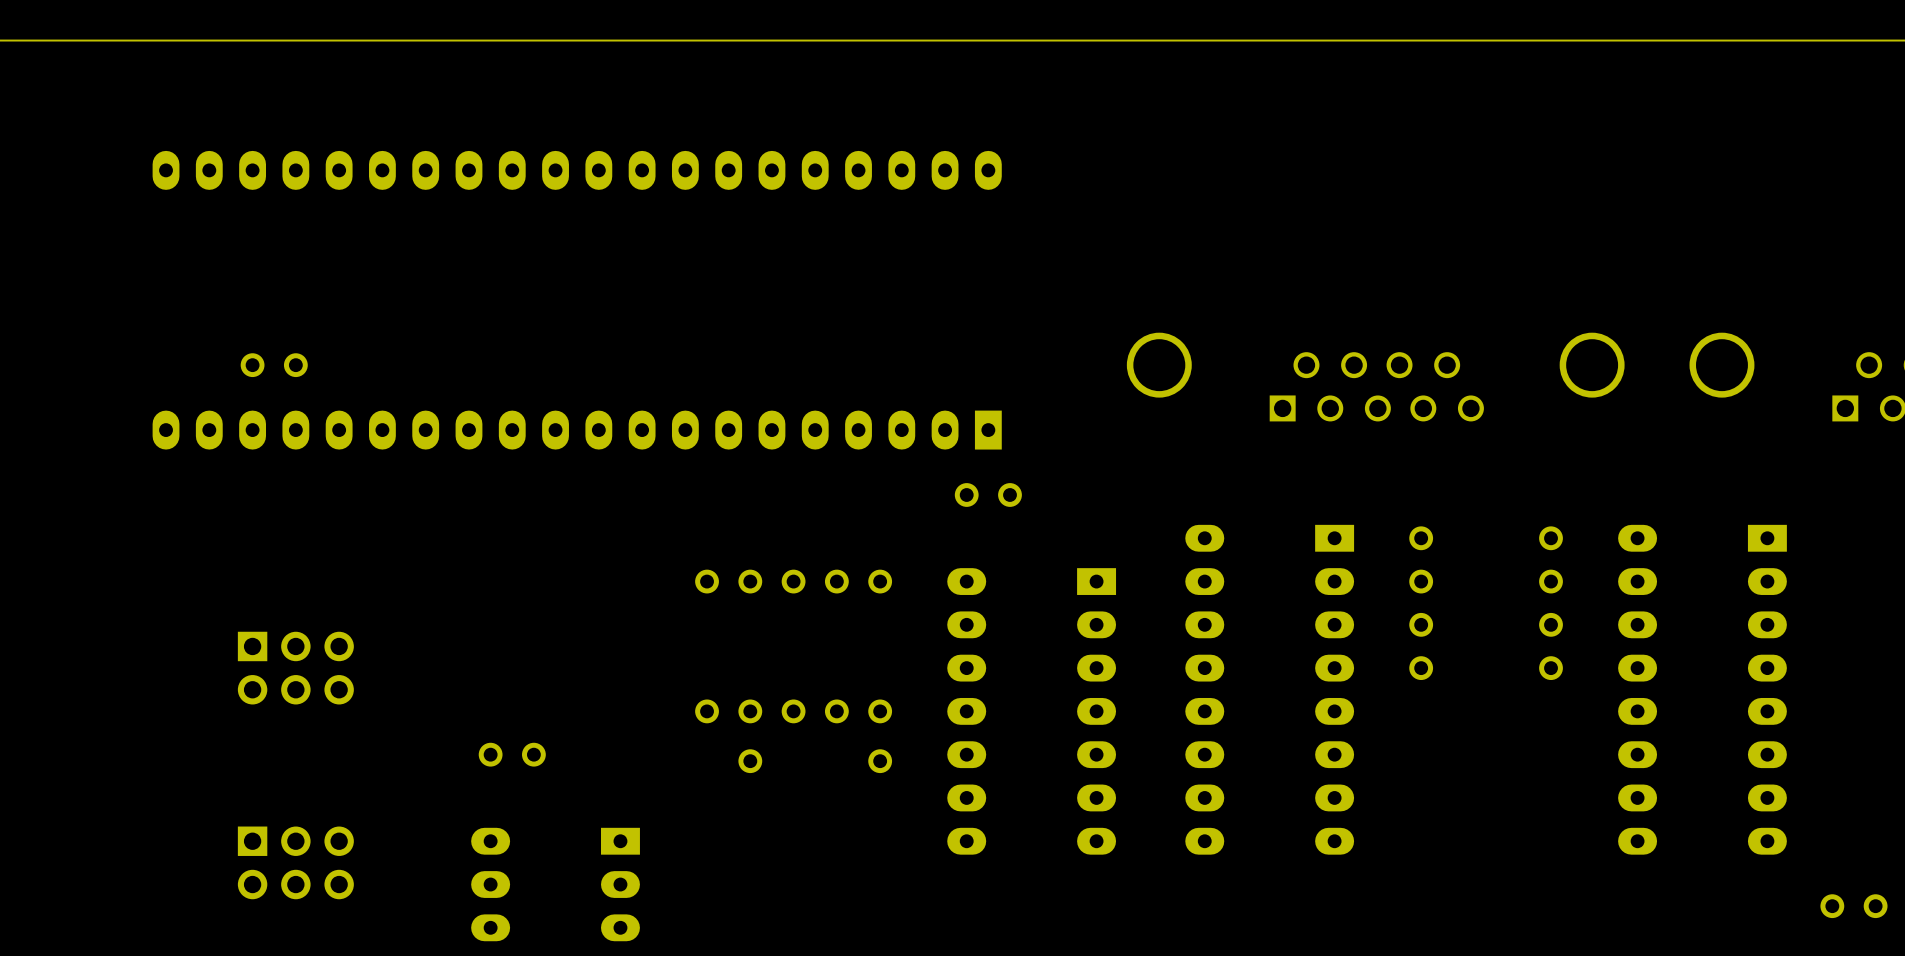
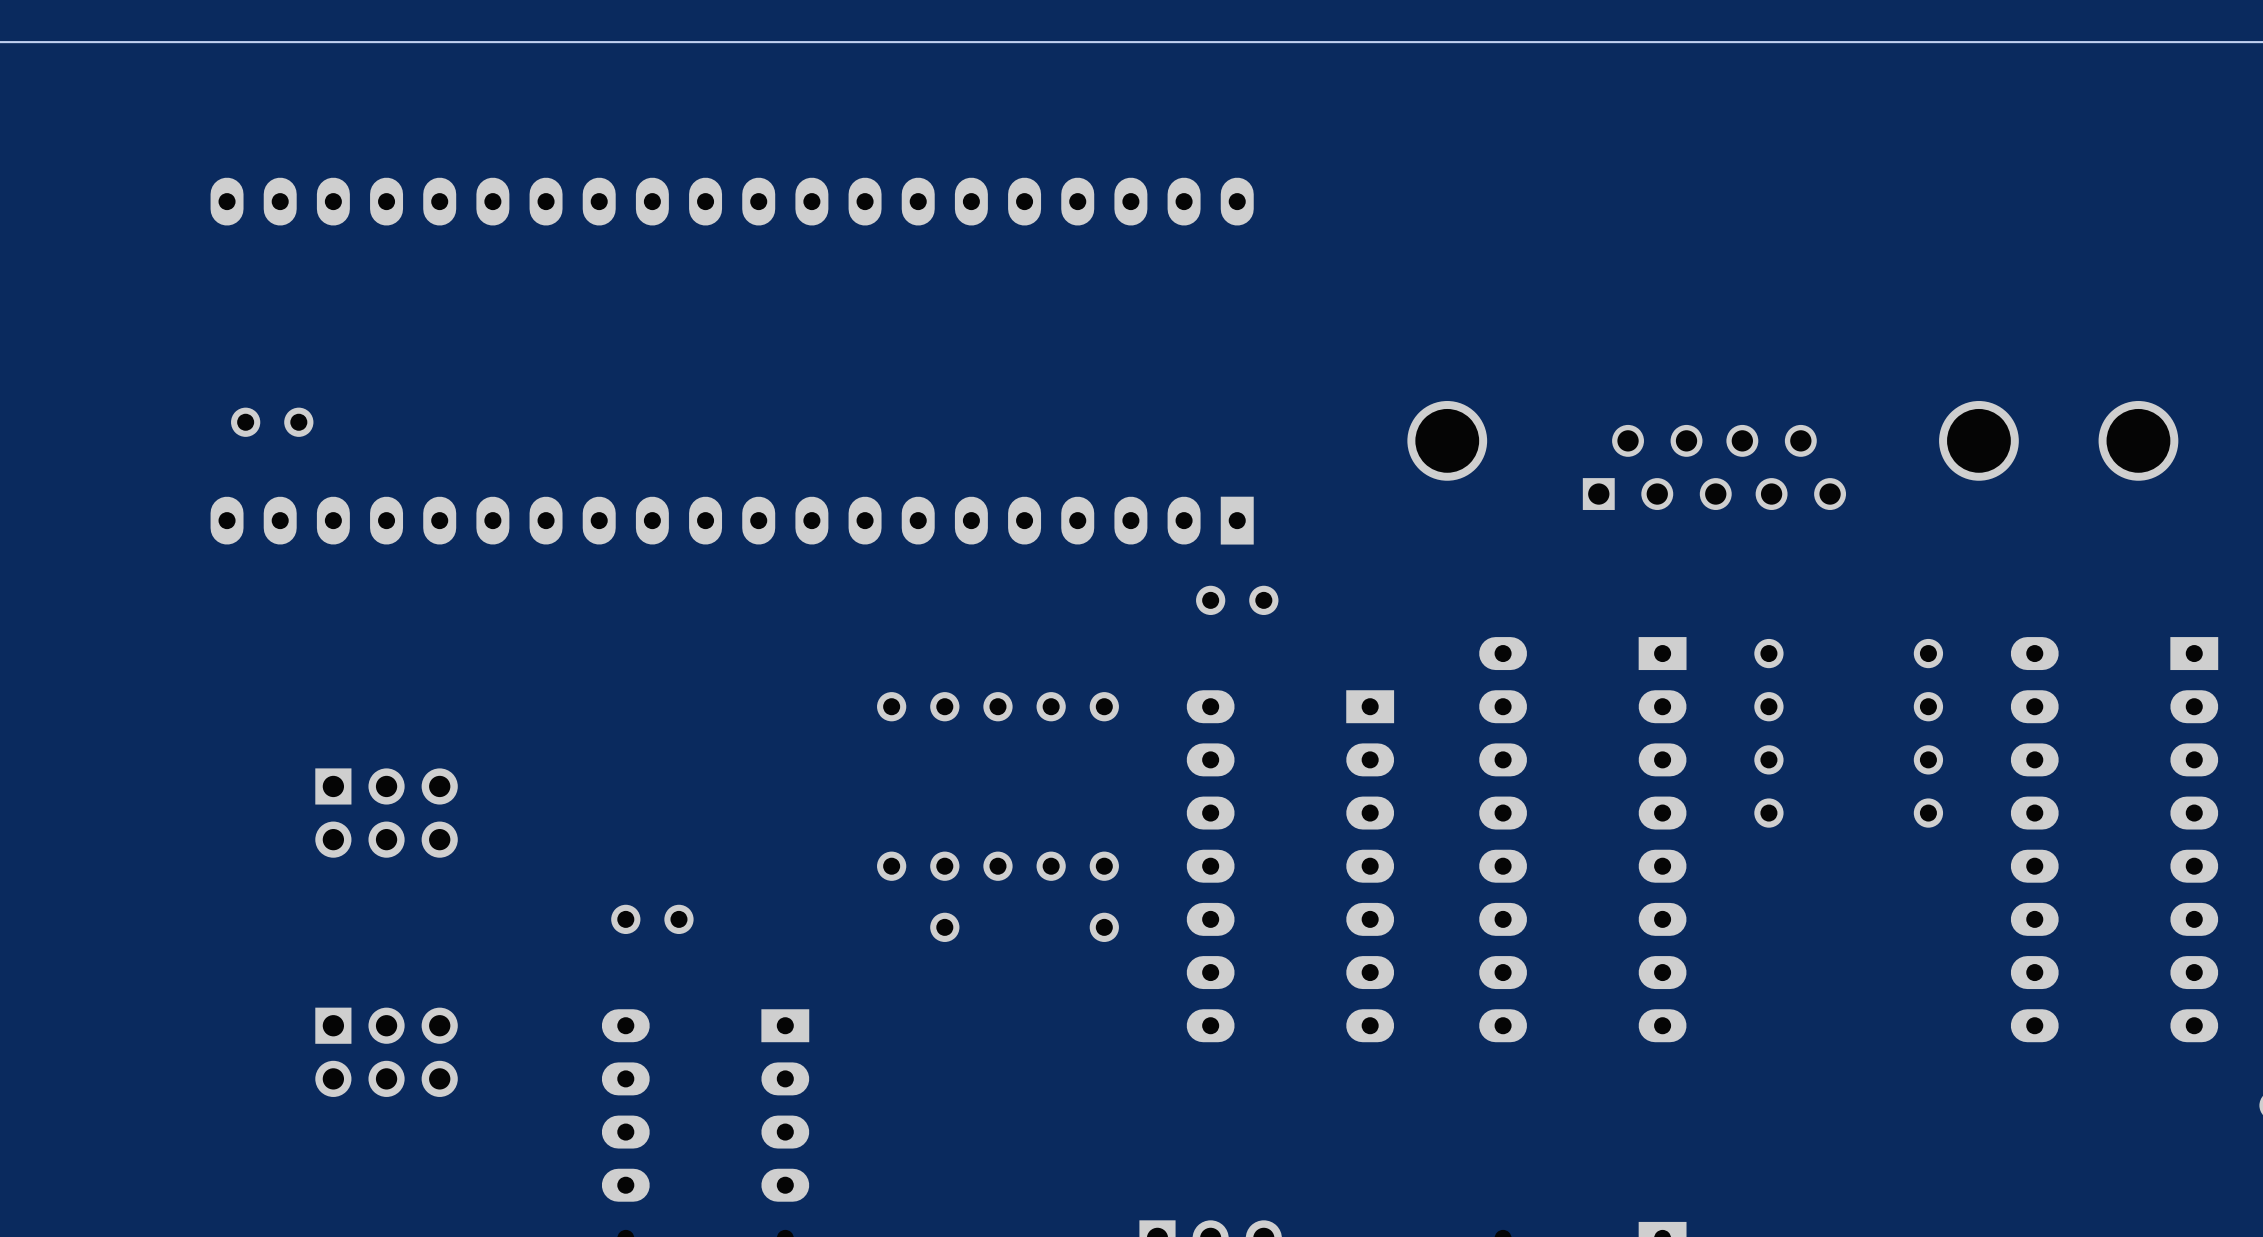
part position: (274, 365) -> (272, 422)

